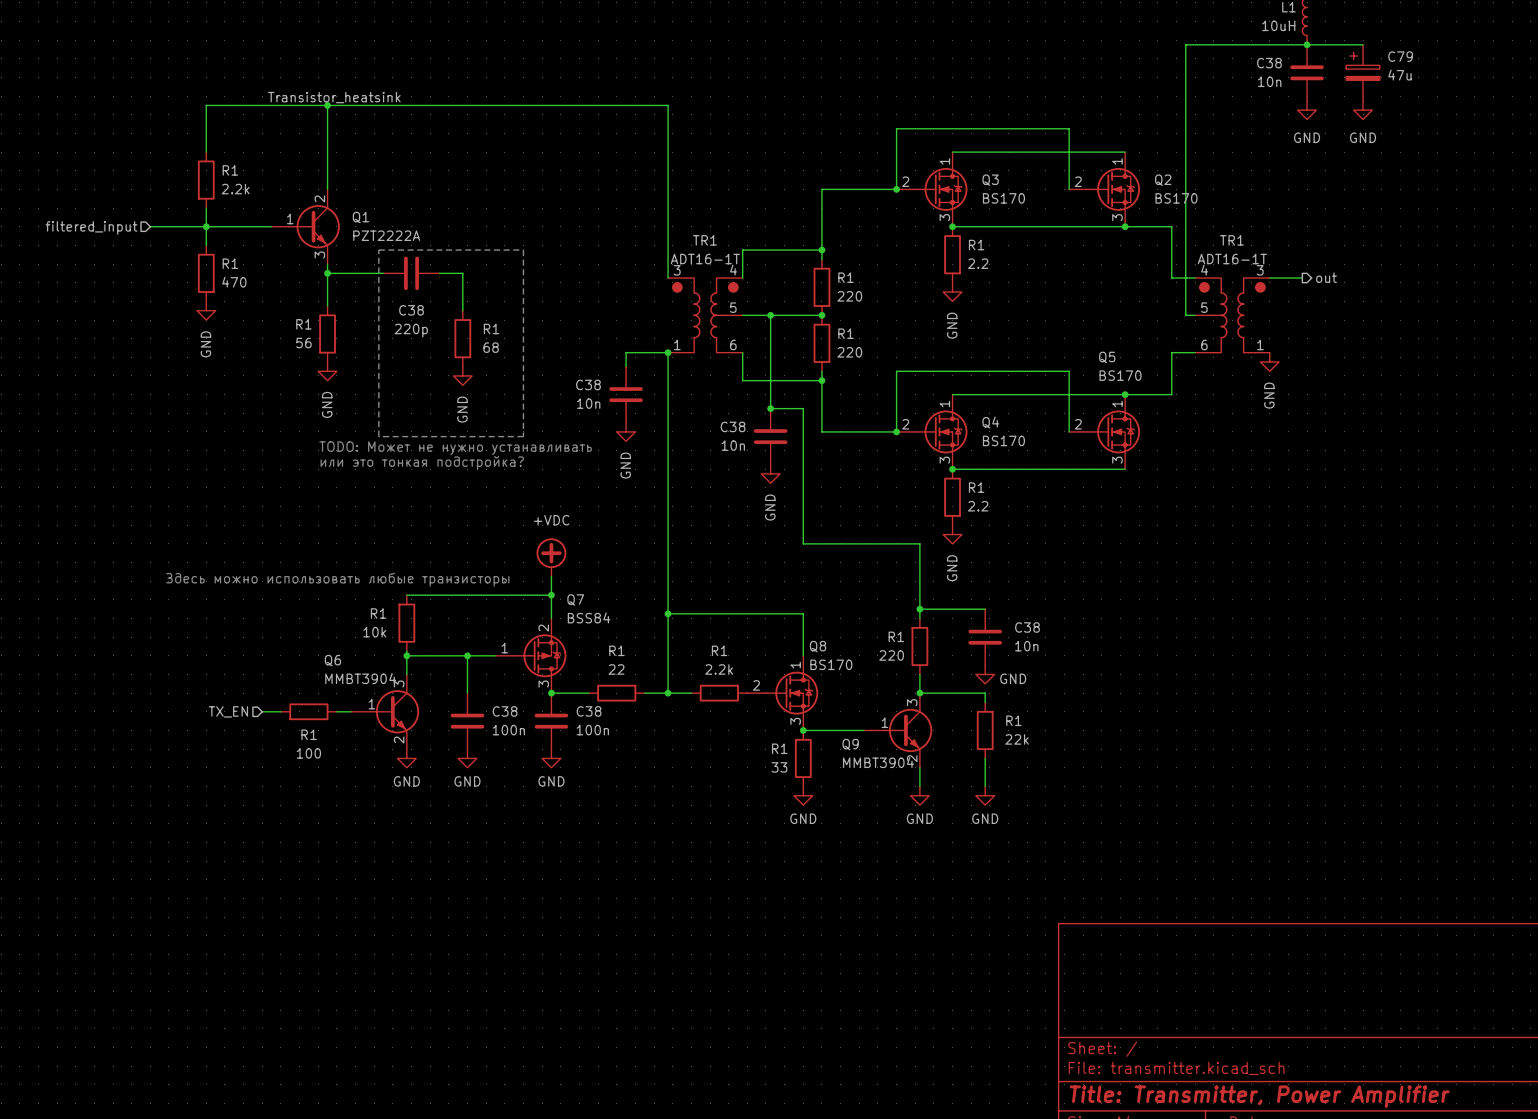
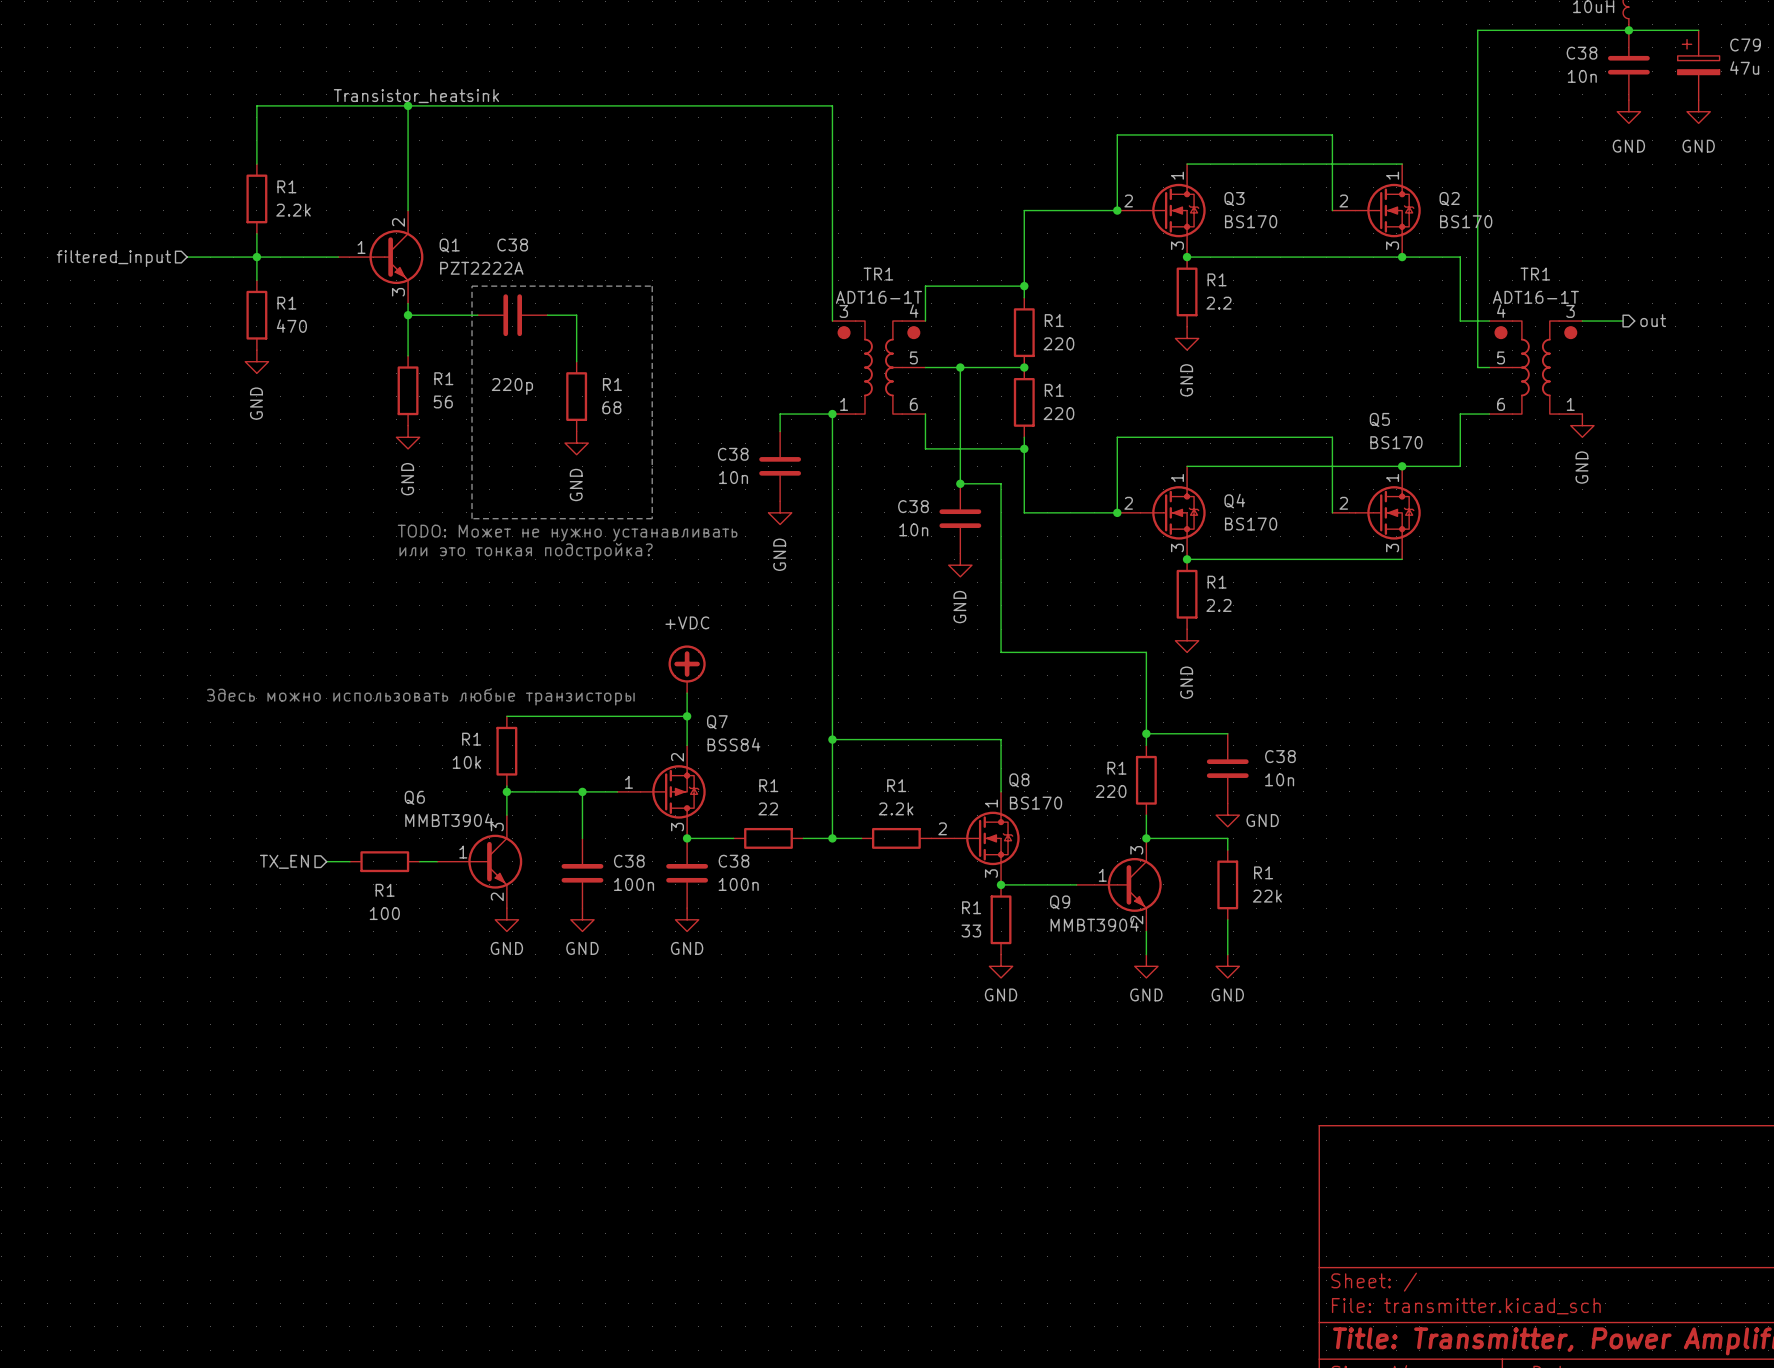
C38 name position: C38 (411, 310) -> C38 (512, 245)
R1 name position: R1 (303, 324) -> R1 (443, 378)
R1 value position: 56 (303, 342) -> 56 (443, 401)

